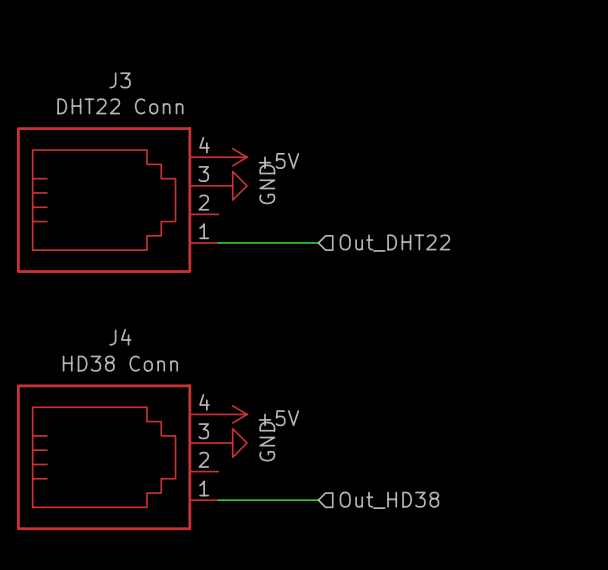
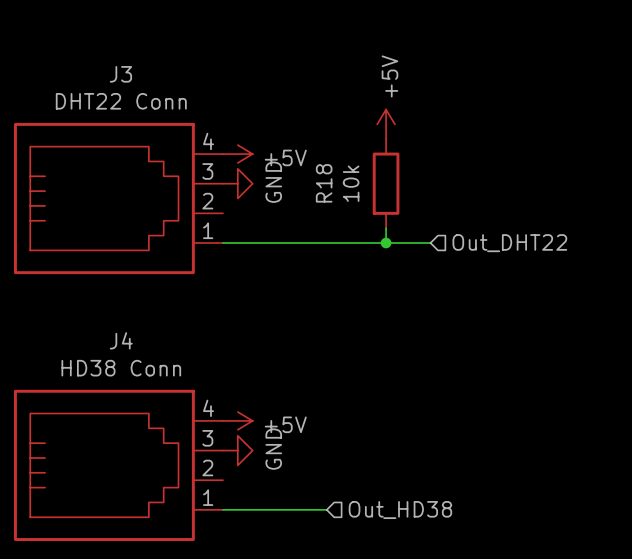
power symbol: none -> +5V (386, 124)
R18: none -> 10k (386, 183)
wire: none -> (386, 228) (386, 243)
wire: none -> (326, 243) (430, 243)
junction: none -> (386, 243)
hierarchical label position: Out_DHT22 (394, 243) -> Out_DHT22 (509, 243)

